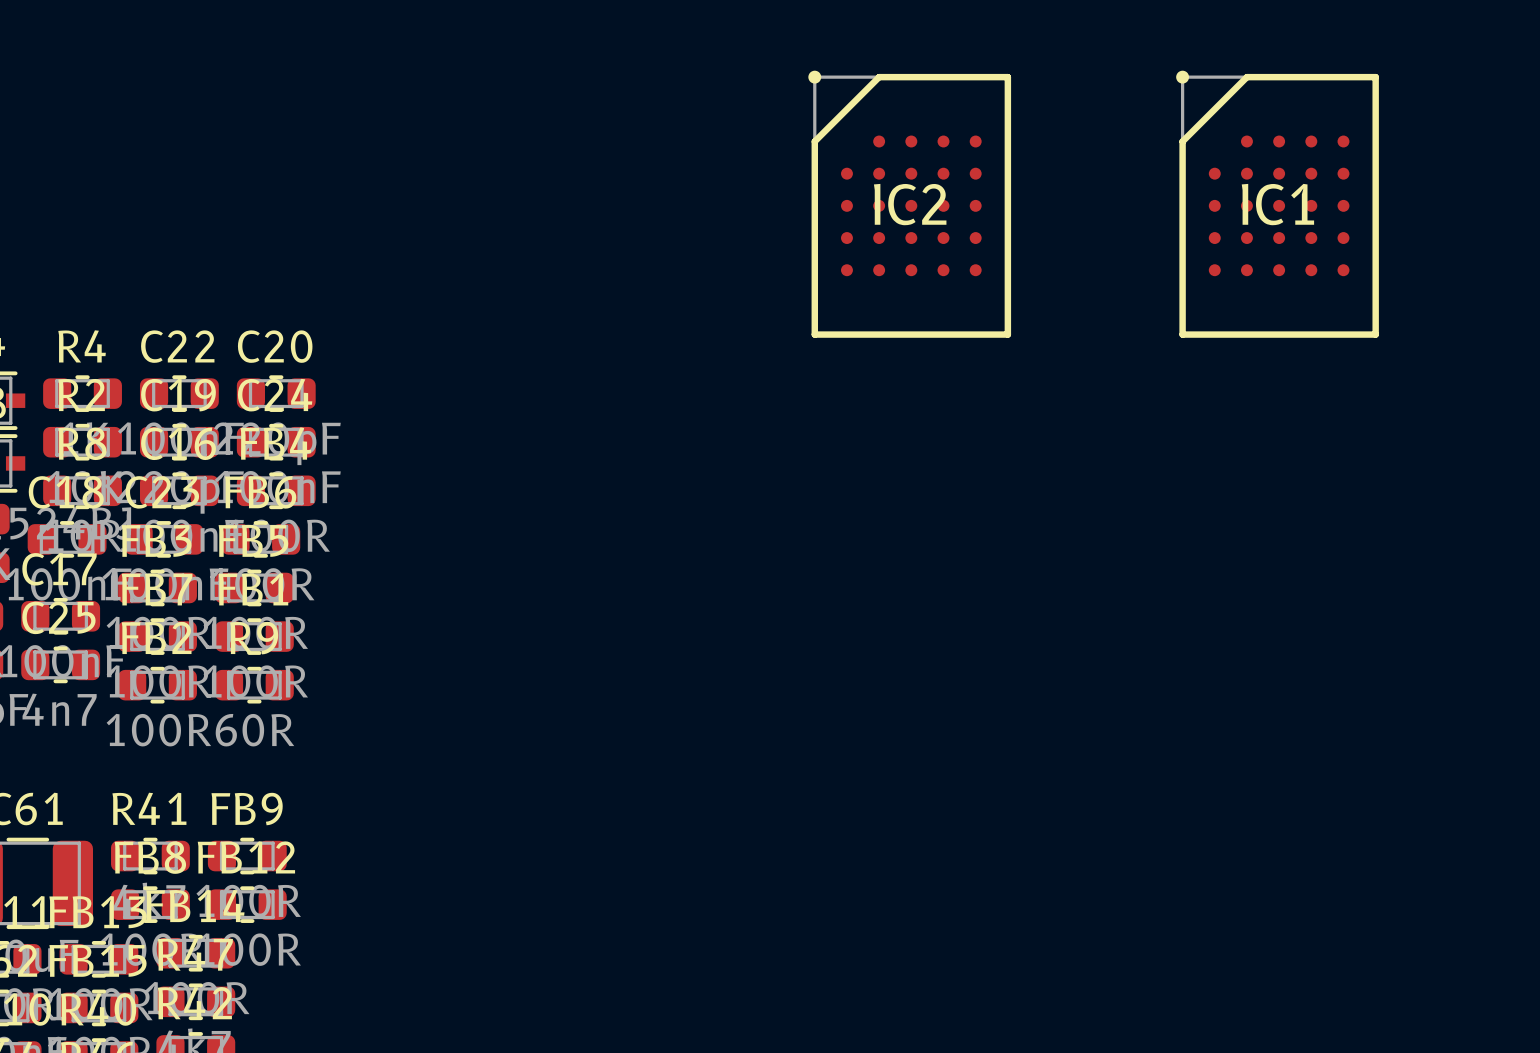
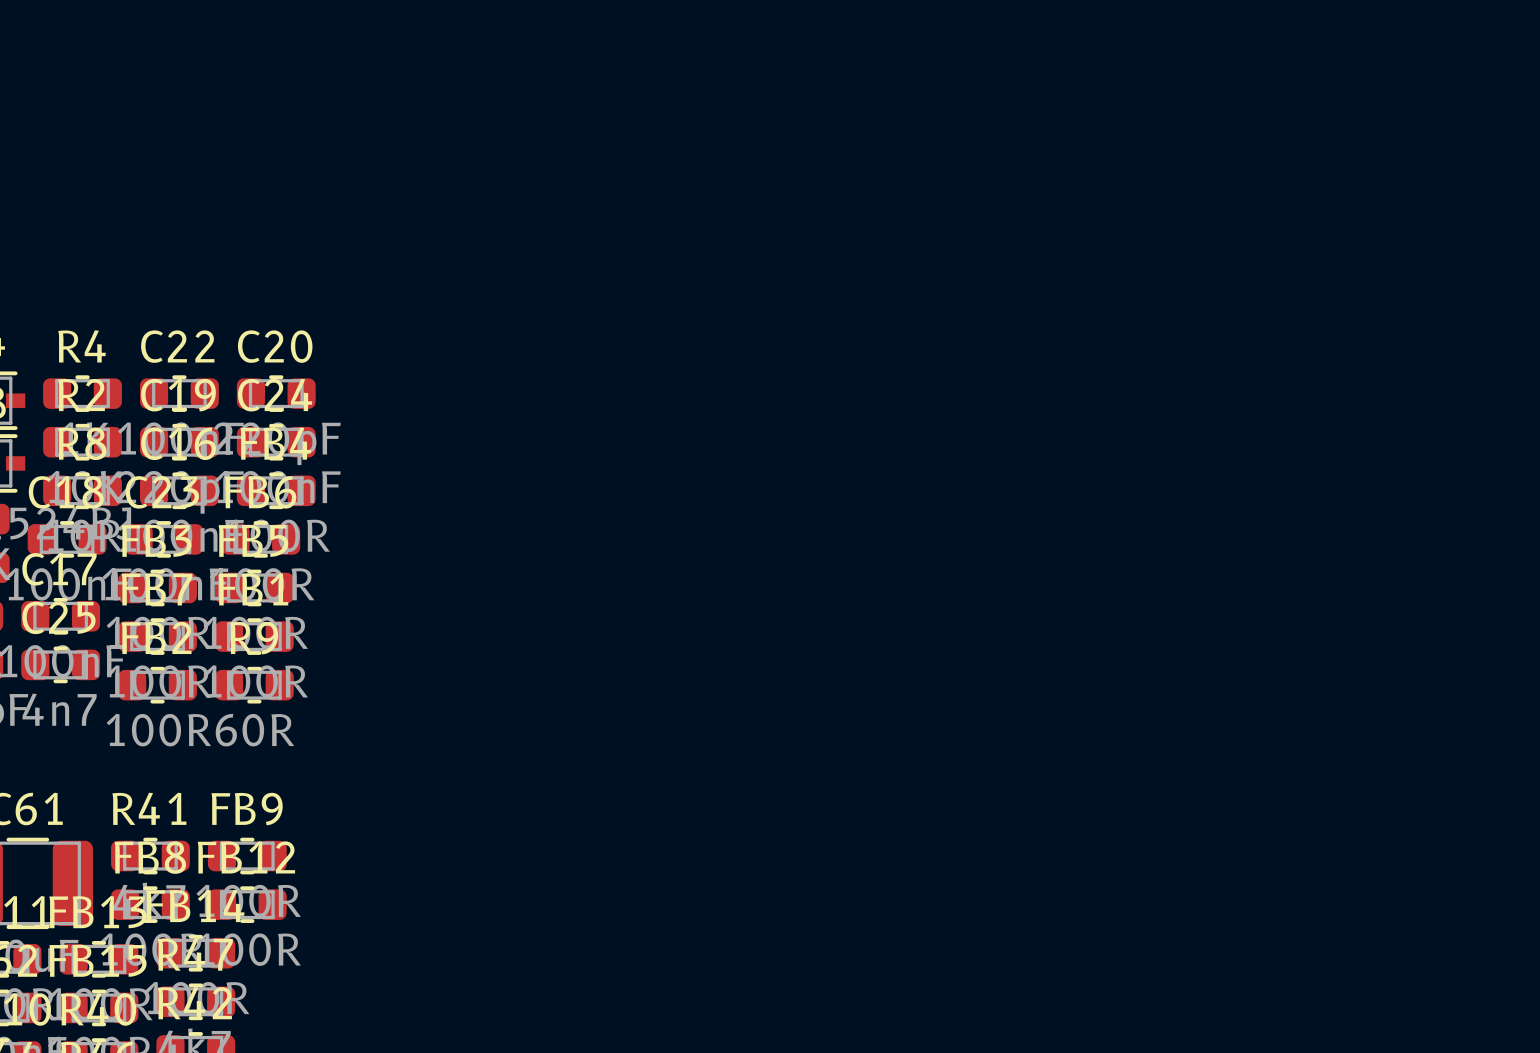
IC2: (909, 204) -> none
IC1: (1277, 204) -> none

